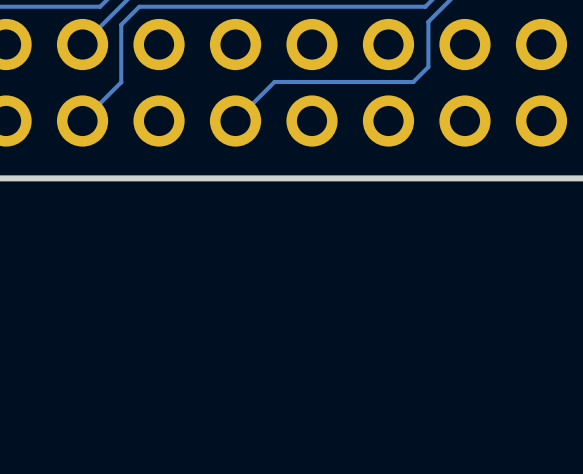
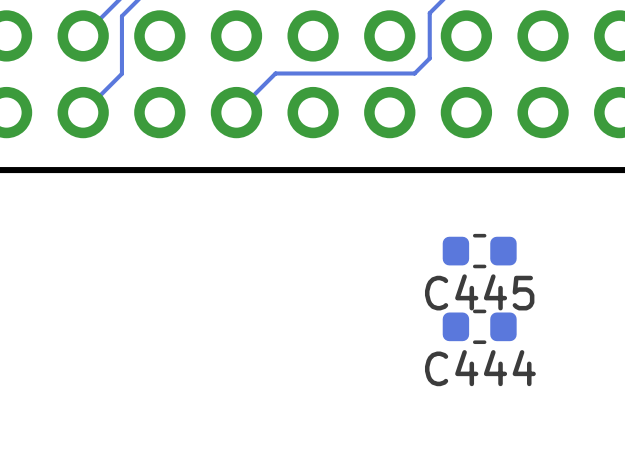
C445: none -> (479, 251)
C444: none -> (479, 326)

